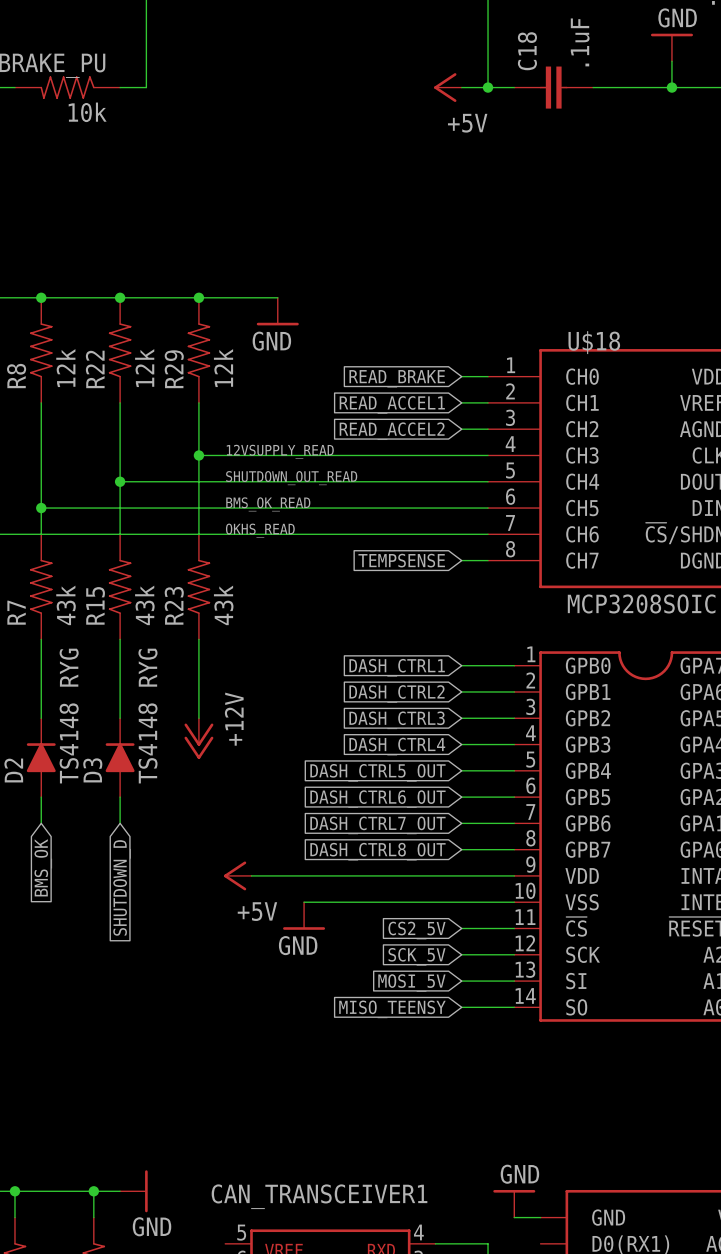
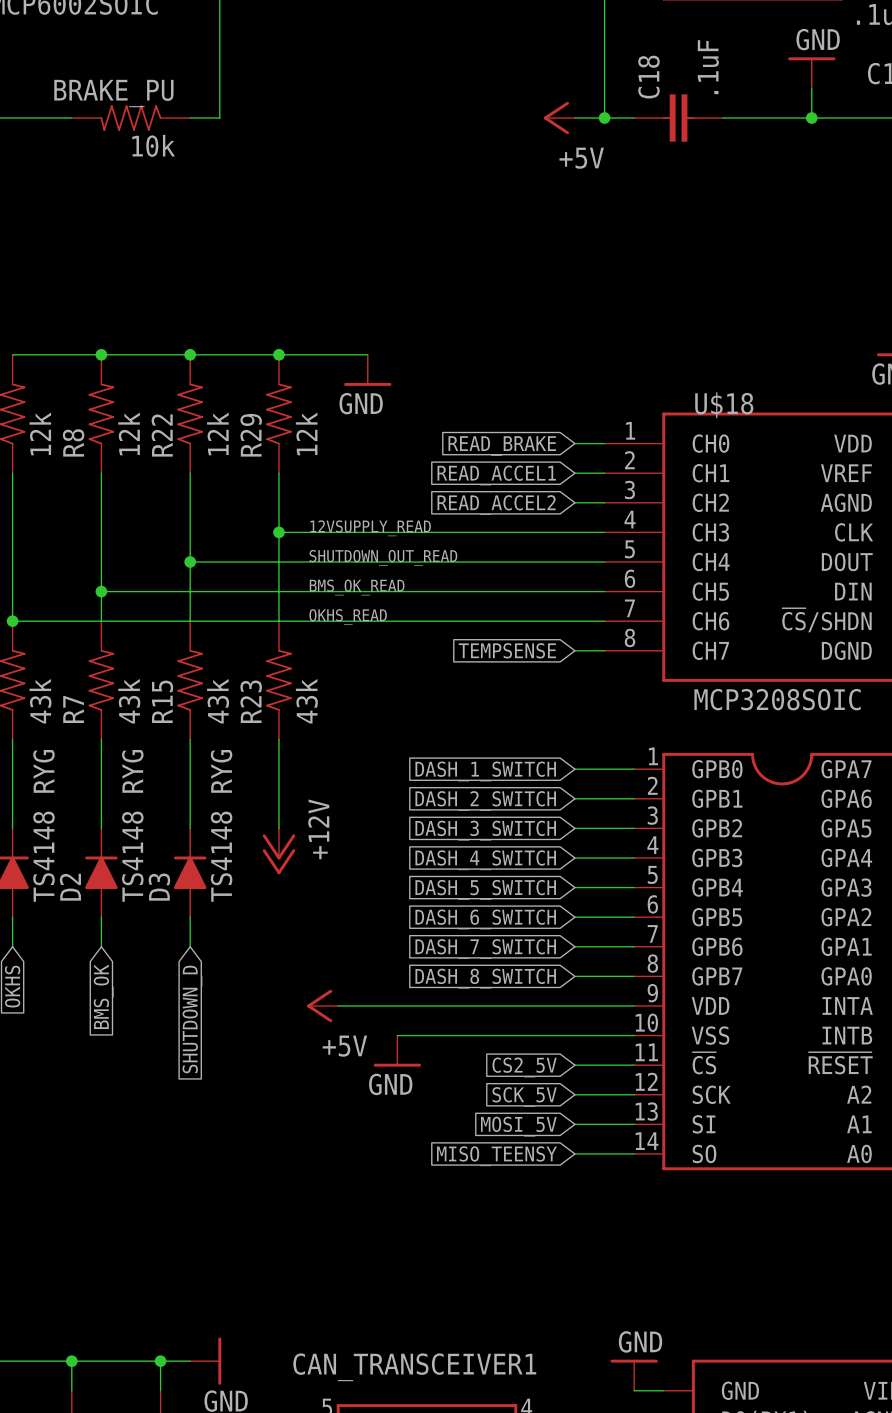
global label: DASH_CTRL1 (397, 667) -> DASH_1_SWITCH (485, 771)
global label: DASH_CTRL2 (396, 693) -> DASH_2_SWITCH (485, 801)
global label: DASH_CTRL3 (397, 720) -> DASH_3_SWITCH (485, 830)
global label: DASH_CTRL4 (397, 746) -> DASH_4_SWITCH (485, 860)
global label: DASH_CTRL5_OUT (377, 772) -> DASH_5_SWITCH (485, 889)
global label: DASH_CTRL6_OUT (377, 799) -> DASH_6_SWITCH (485, 919)
global label: DASH_CTRL7_OUT (377, 825) -> DASH_7_SWITCH (485, 949)
global label: DASH_CTRL8_OUT (377, 851) -> DASH_8_SWITCH (485, 978)

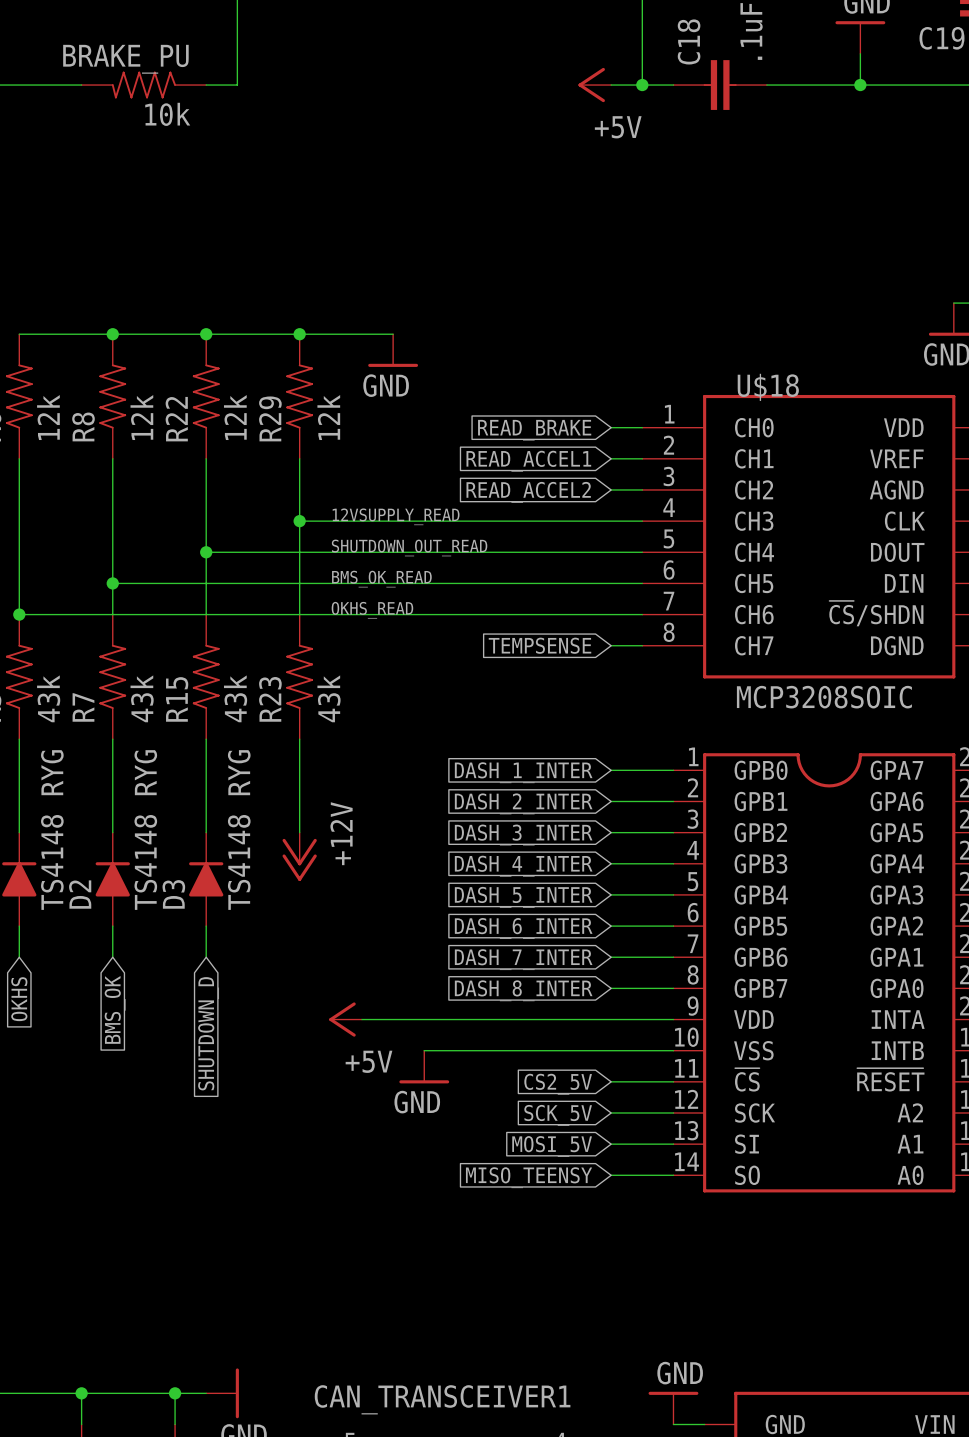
global label: DASH_1_SWITCH (485, 771) -> DASH_1_INTER (523, 772)
global label: DASH_2_SWITCH (485, 801) -> DASH_2_INTER (523, 803)
global label: DASH_3_SWITCH (485, 830) -> DASH_3_INTER (523, 835)
global label: DASH_4_SWITCH (485, 860) -> DASH_4_INTER (523, 866)
global label: DASH_5_SWITCH (485, 889) -> DASH_5_INTER (523, 897)
global label: DASH_6_SWITCH (485, 919) -> DASH_6_INTER (523, 928)
global label: DASH_7_SWITCH (485, 949) -> DASH_7_INTER (523, 959)
global label: DASH_8_SWITCH (485, 978) -> DASH_8_INTER (523, 990)

